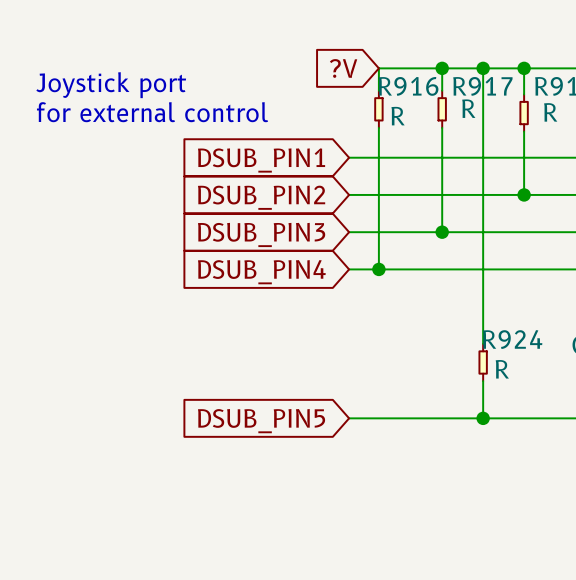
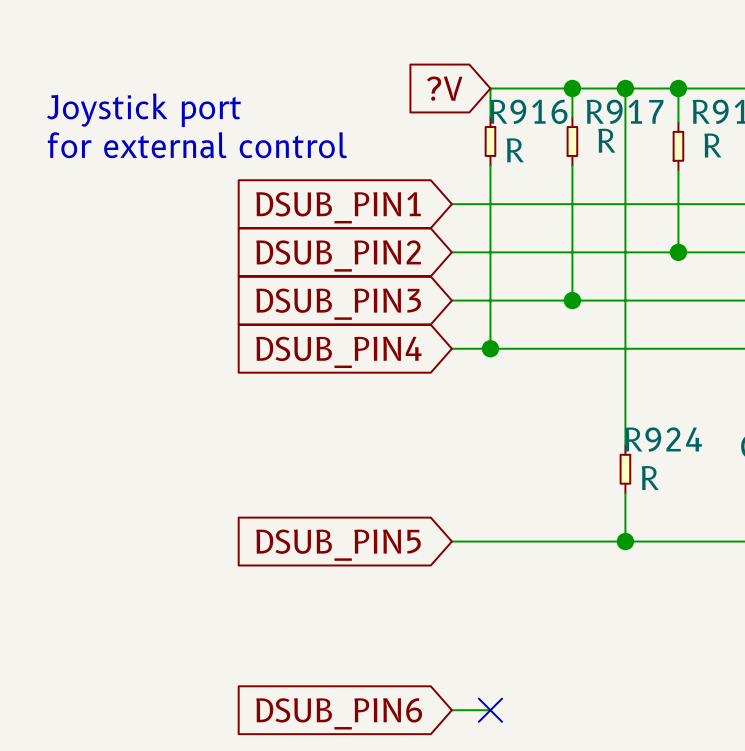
wire: none -> (451, 710) (490, 710)
no-connect mark: none -> (490, 710)
global label: none -> DSUB_PIN6 (339, 713)

